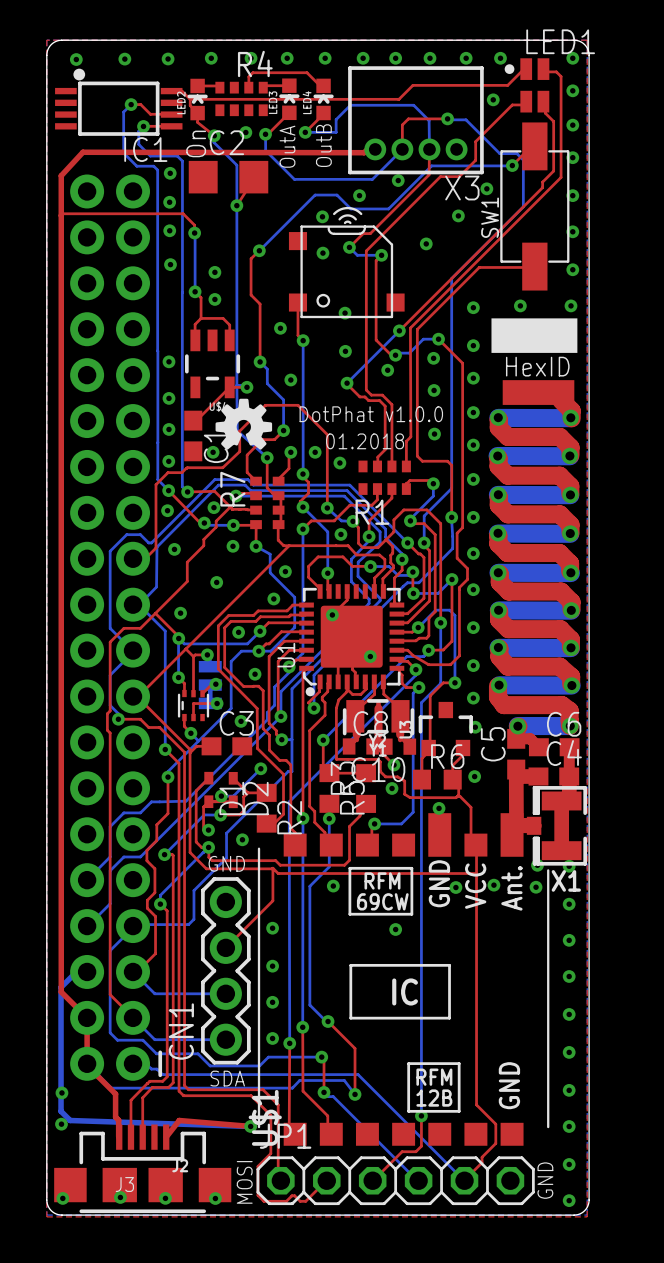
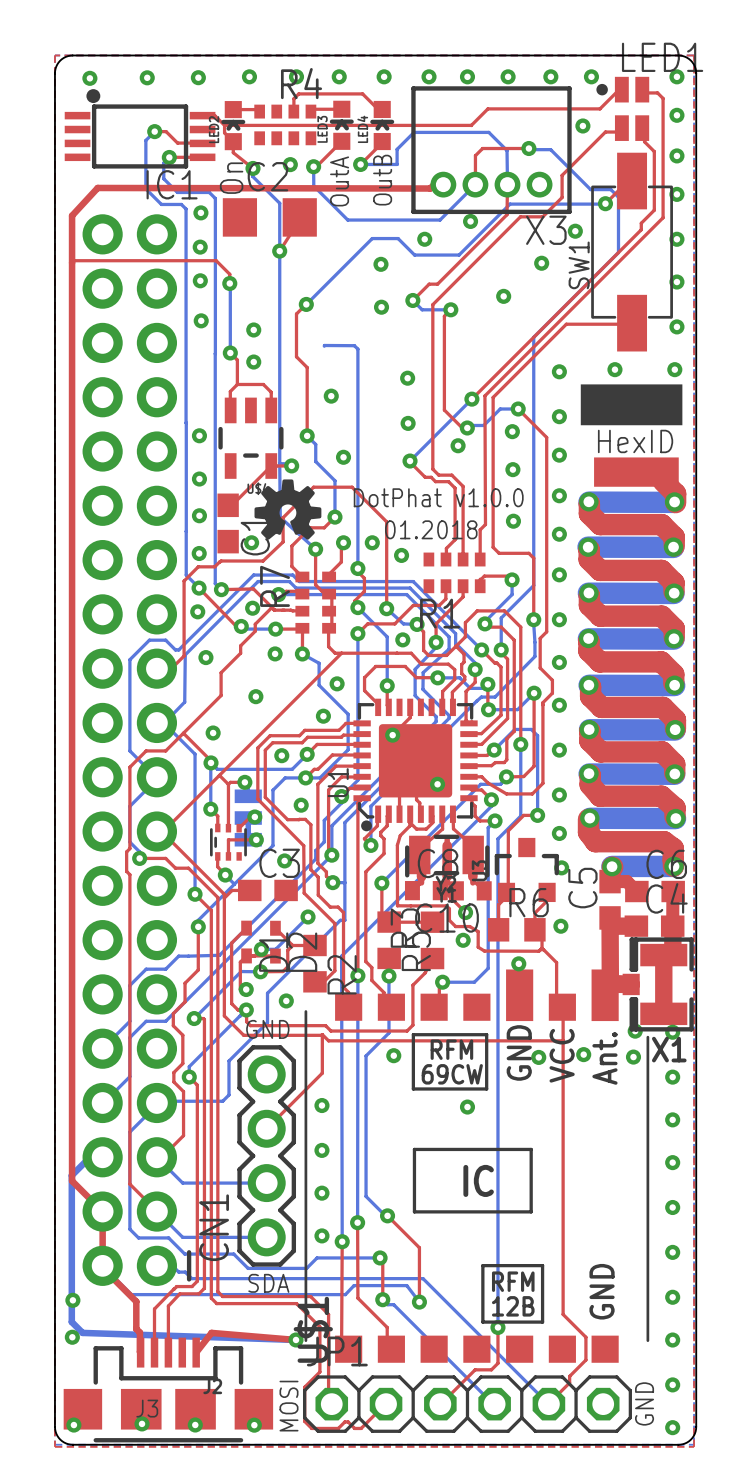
part: (346, 262) -> none
top track: (297, 302) (297, 335) (303, 340) -> none
bottom track: (303, 340) (303, 474) -> (324, 346) (354, 345) (357, 349) (357, 568)
via: (303, 340) -> none

